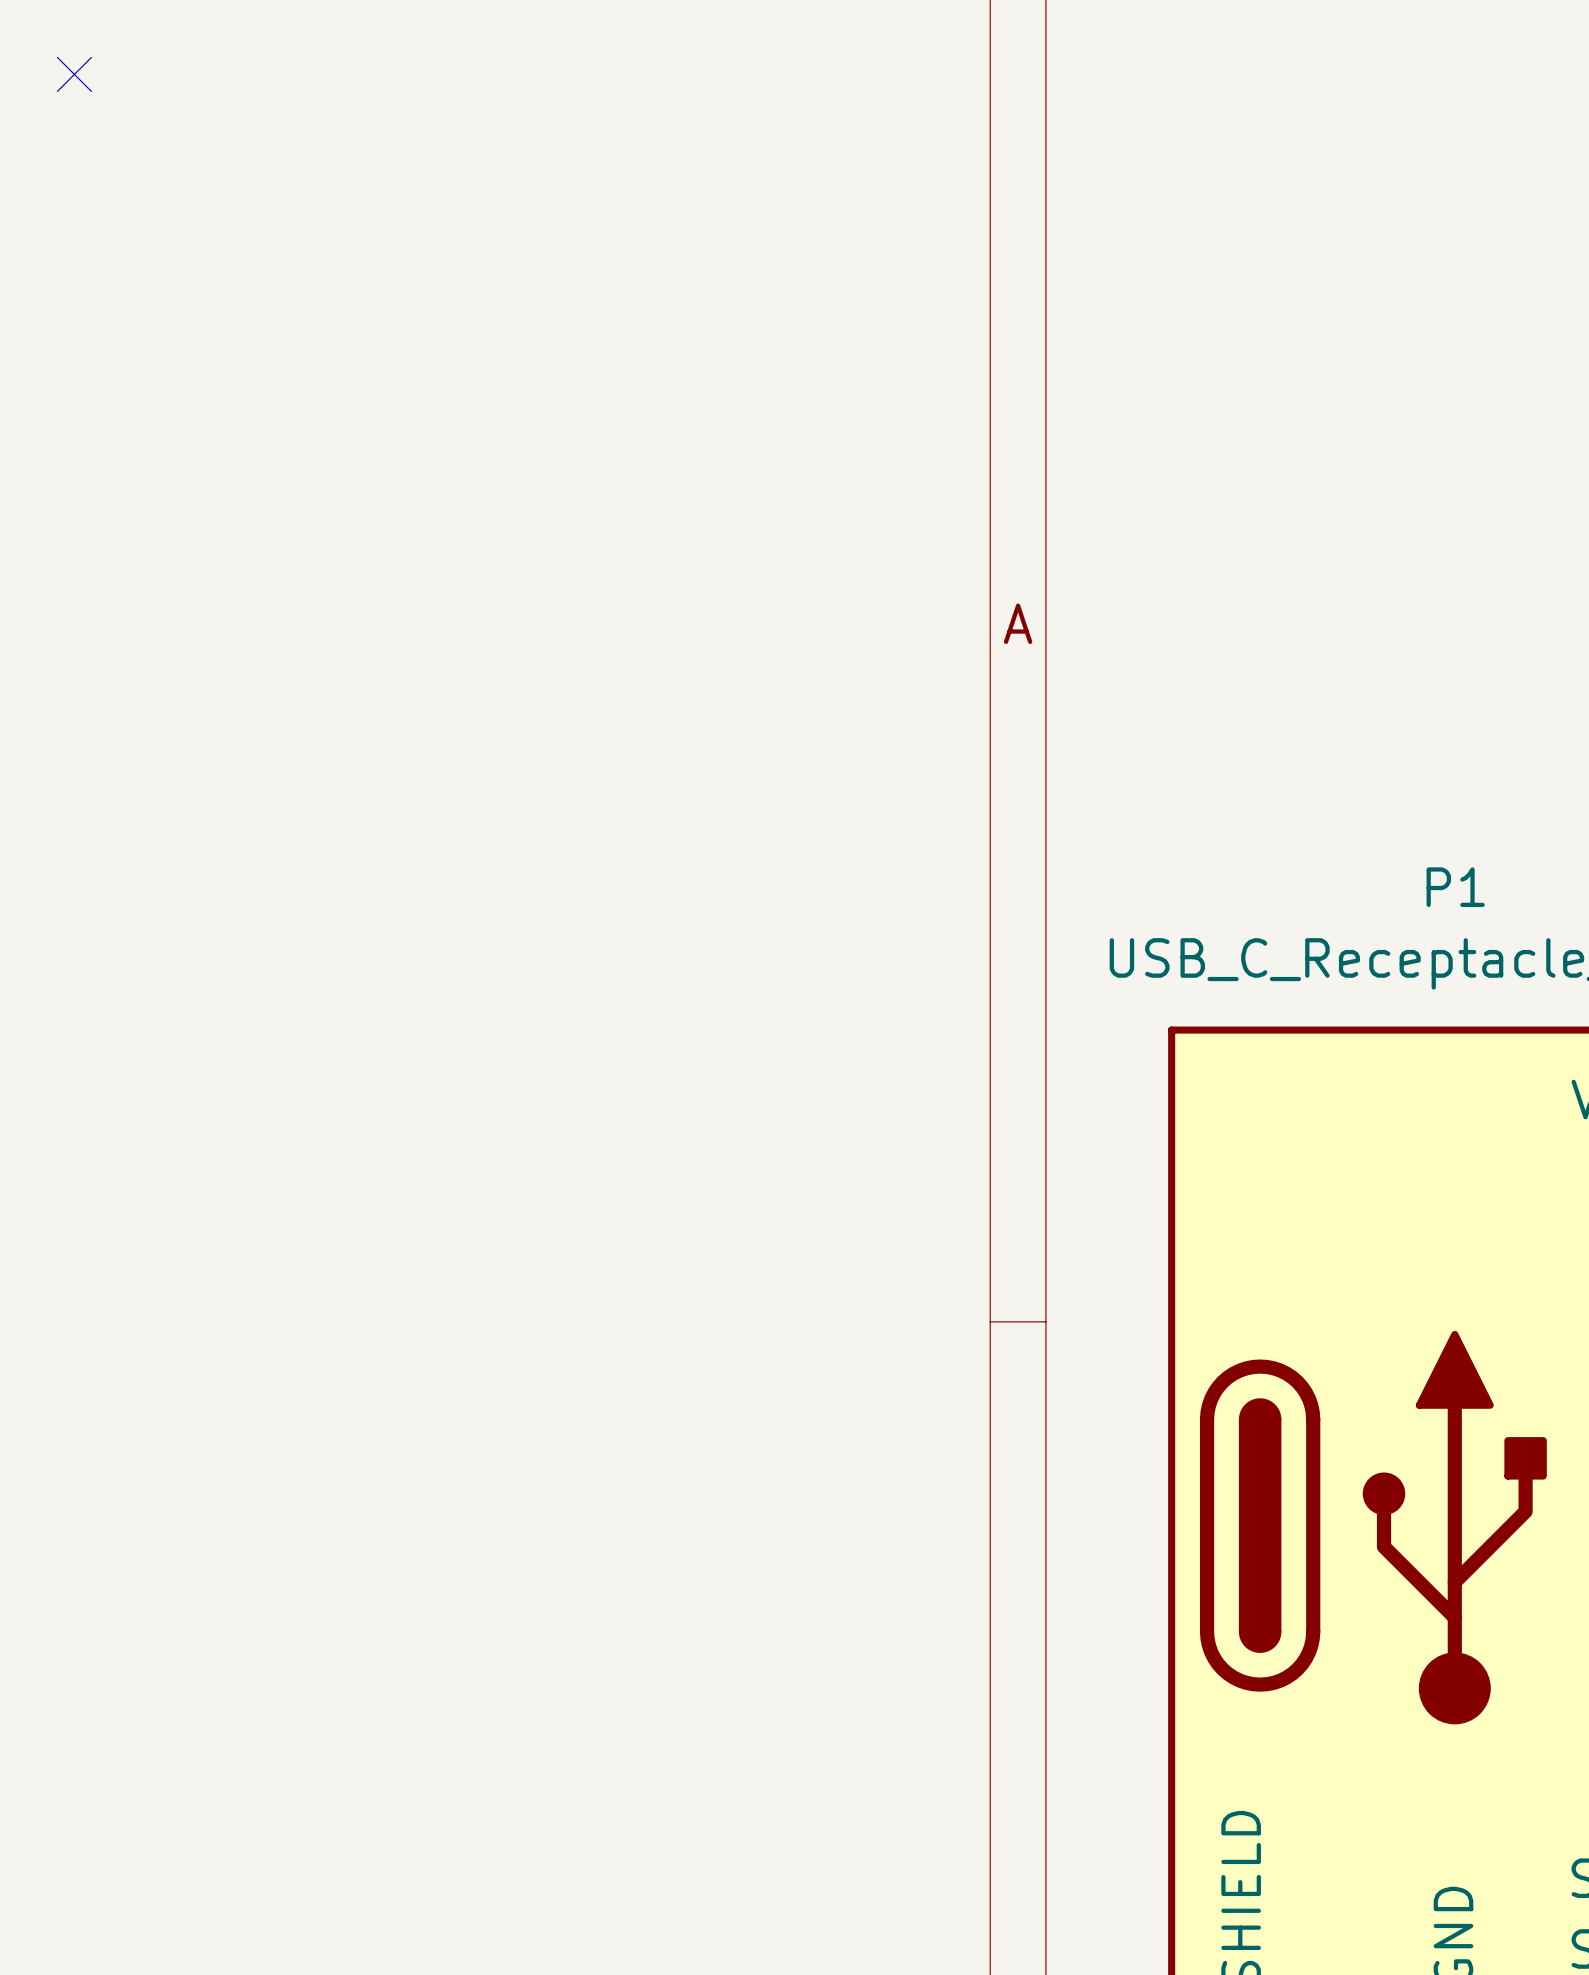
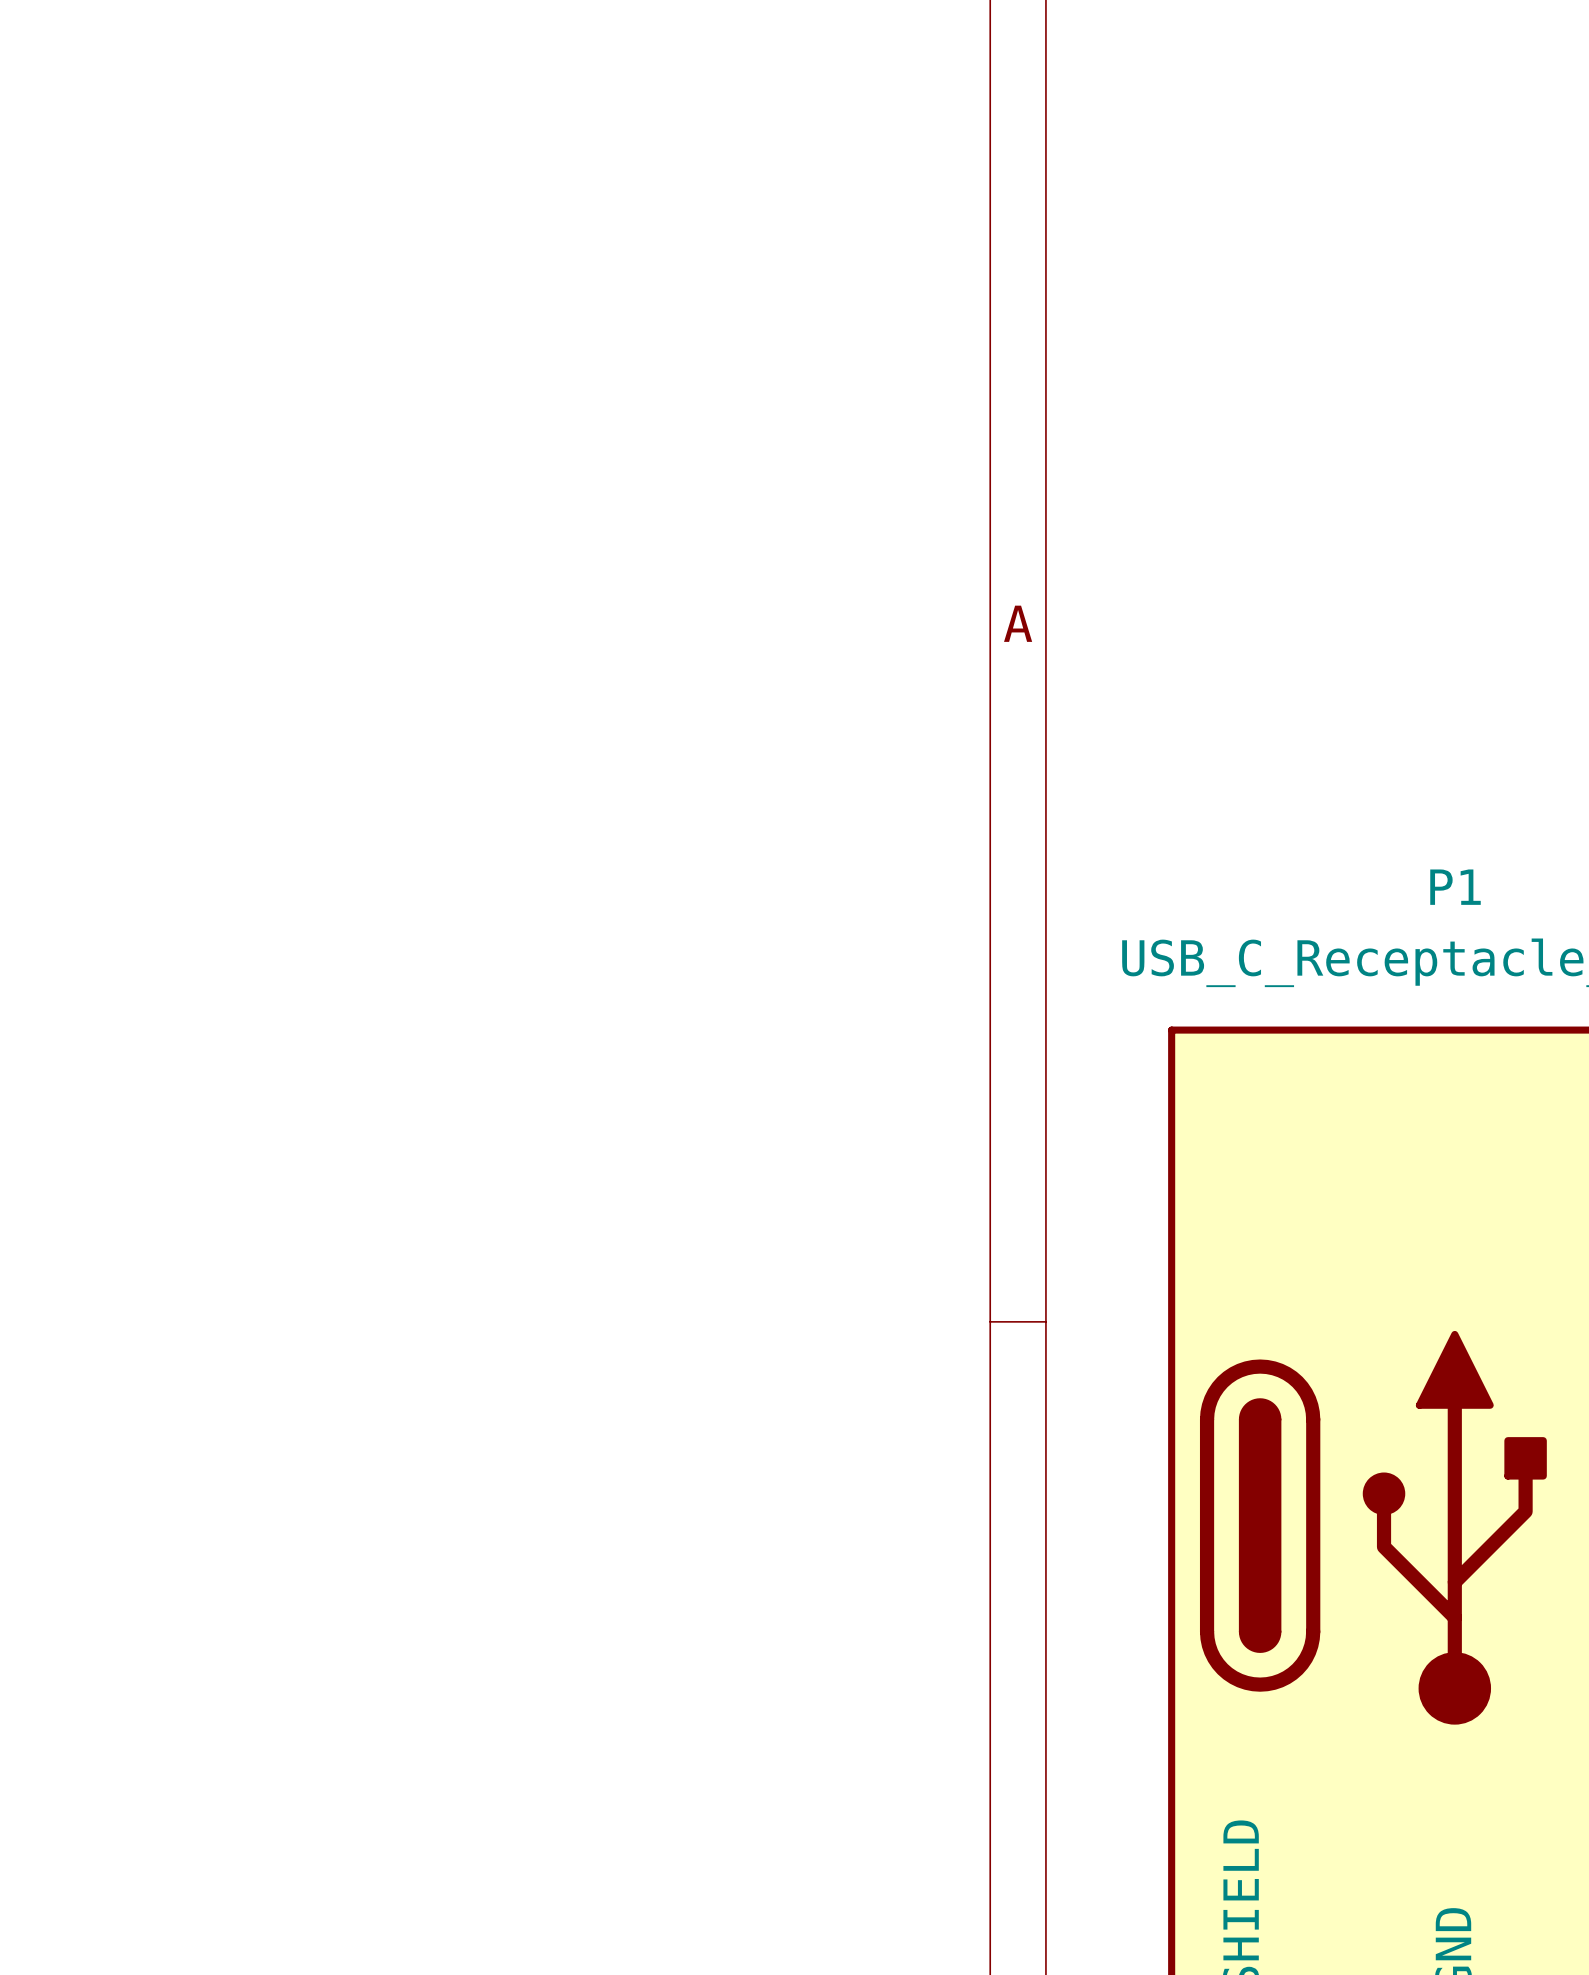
no-connect mark: (74, 74) -> none

